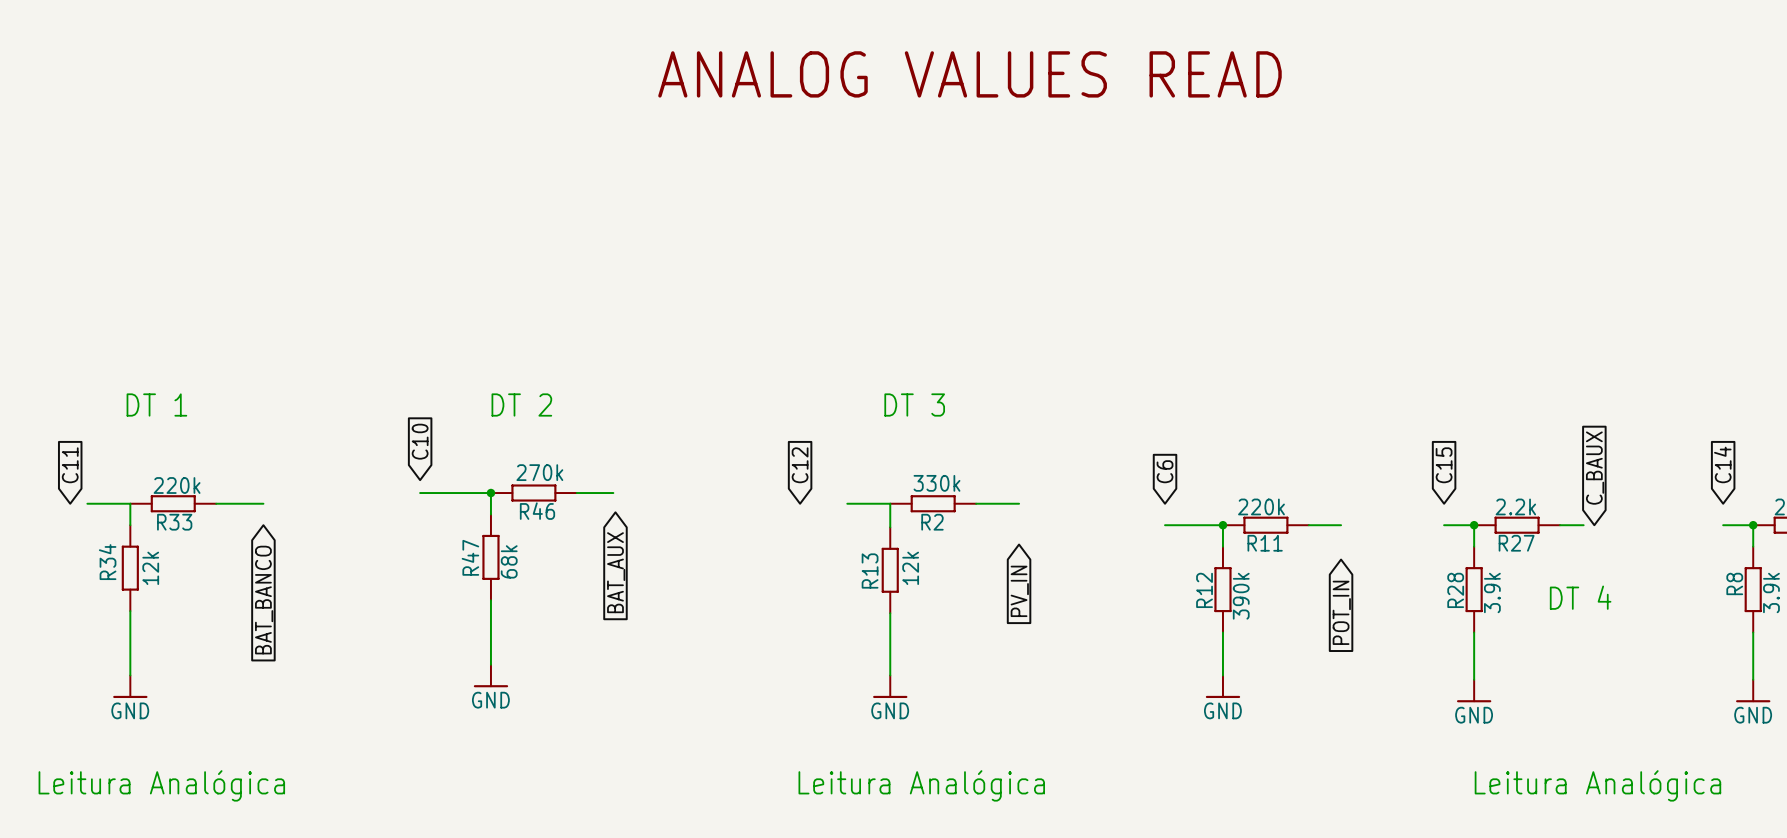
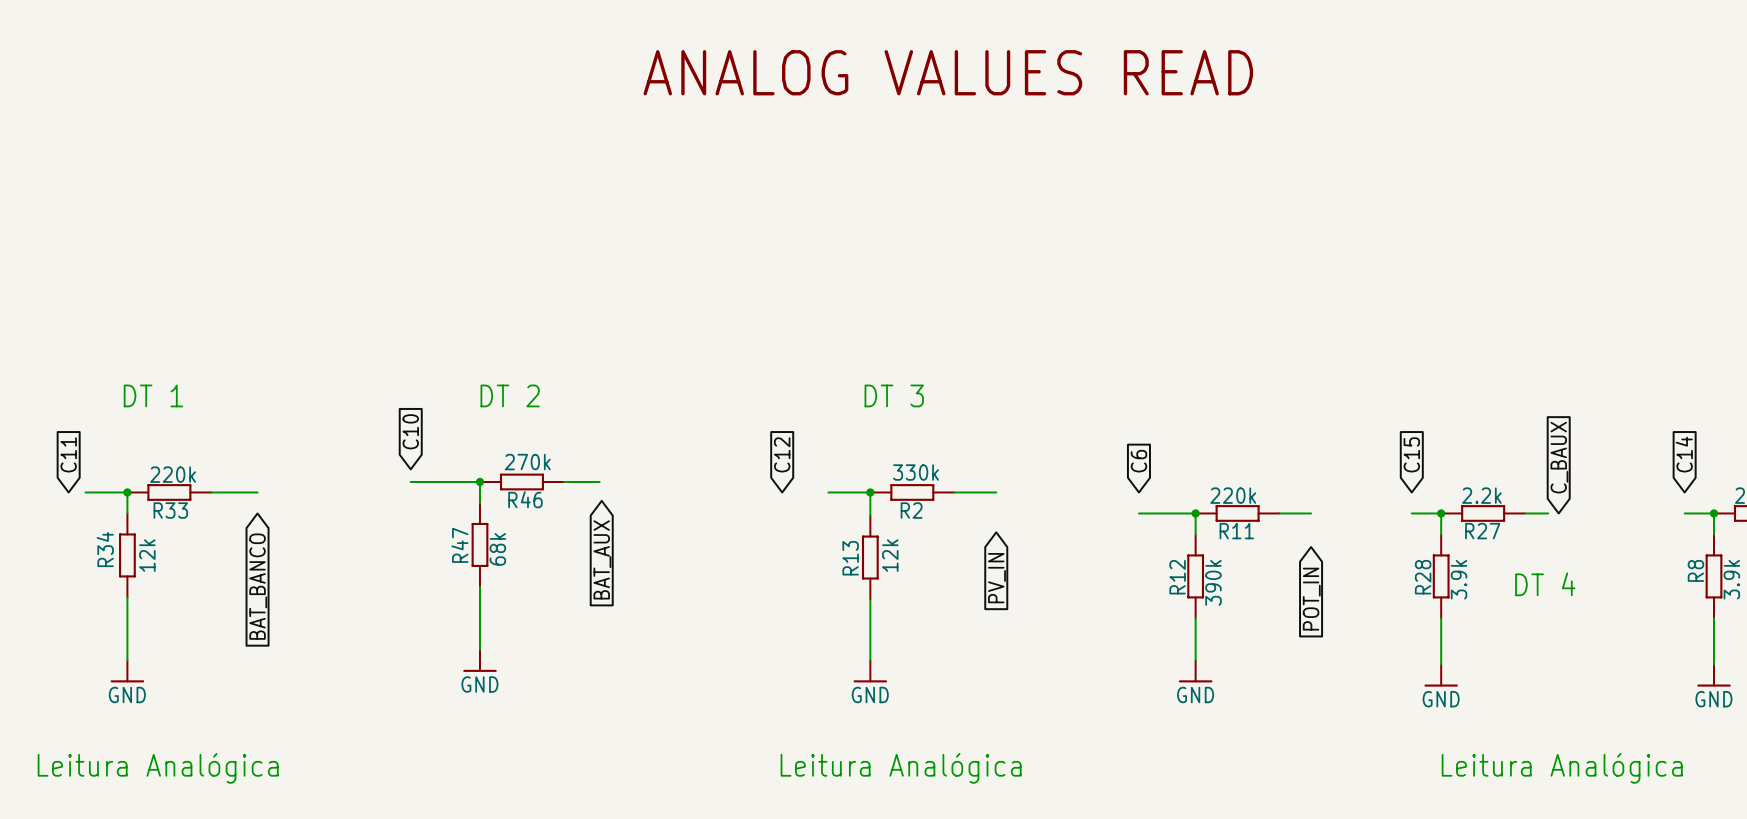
junction: none -> (127, 492)
junction: none -> (870, 492)

